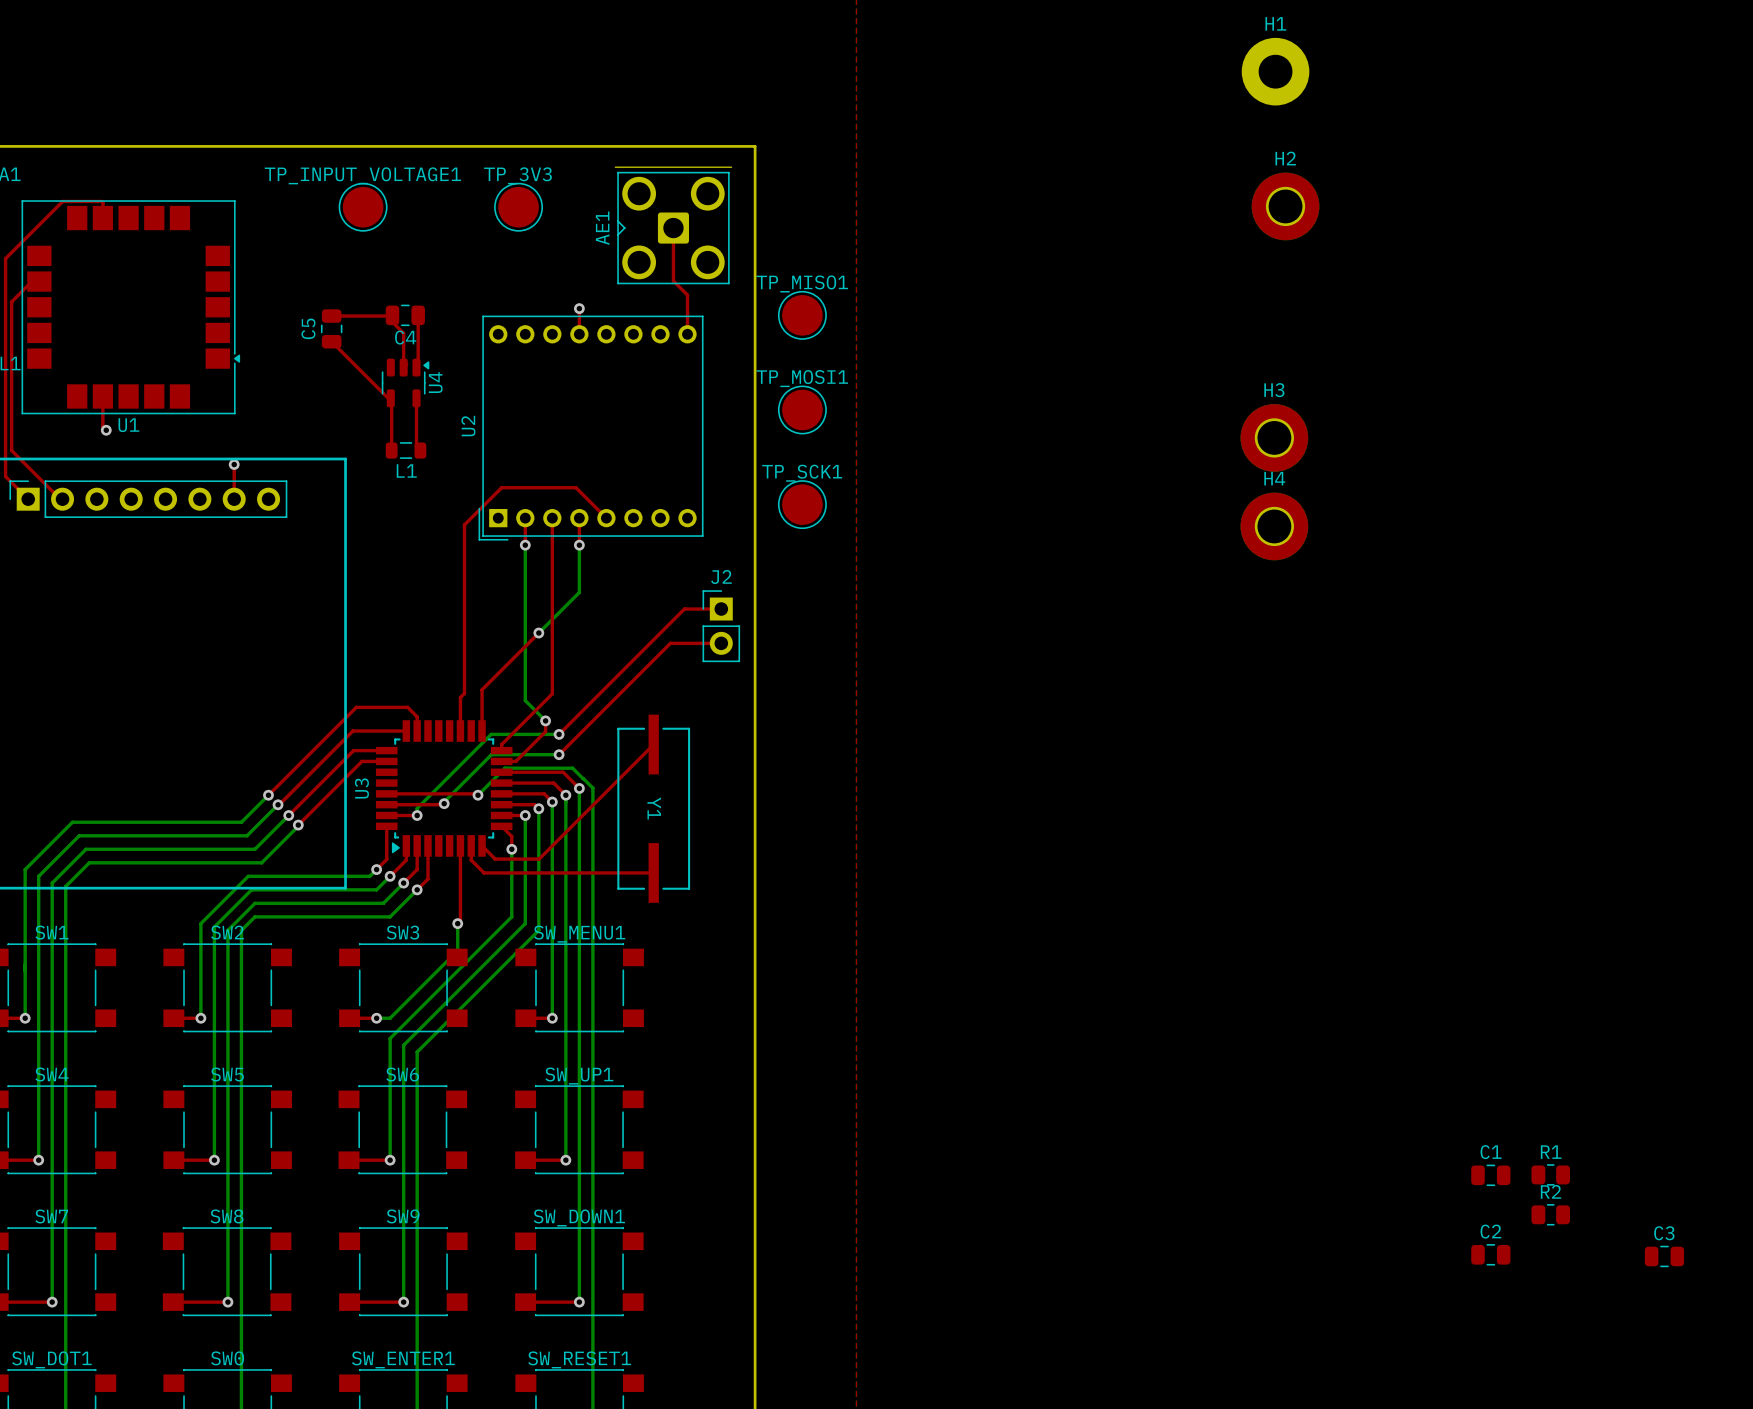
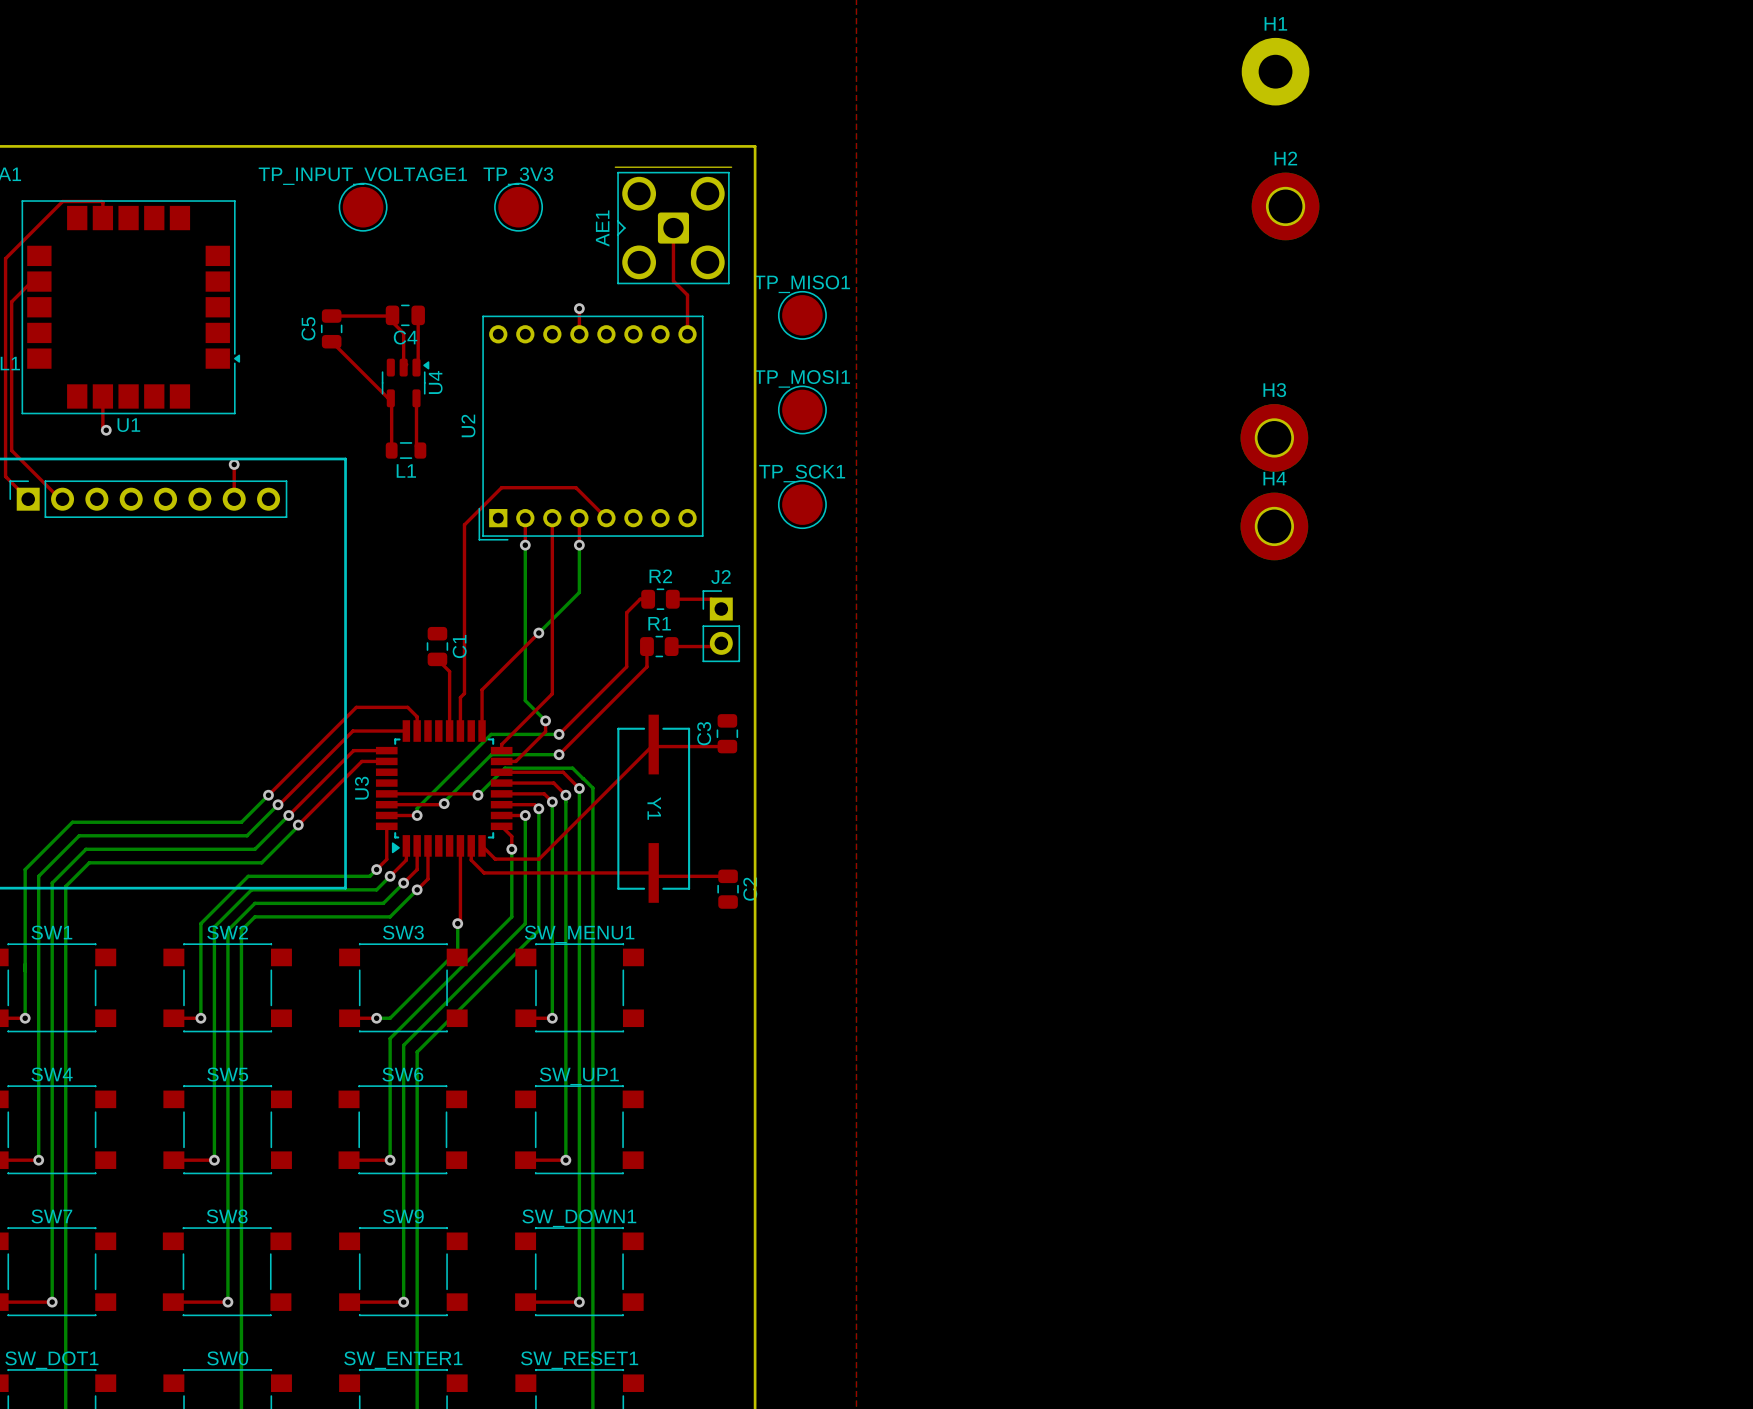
top track: none -> (672, 599) (711, 599) (721, 609)
top track: (721, 609) (684, 609) (626, 666) -> (648, 599) (640, 599) (626, 612) (626, 666)
top track: (721, 643) (670, 643) (646, 666) -> (721, 643) (718, 646) (671, 646)
top track: none -> (646, 646) (646, 666)
top track: none -> (437, 659) (449, 671) (449, 731)
top track: none -> (653, 744) (655, 746) (727, 746)
top track: none -> (653, 872) (657, 876) (728, 876)
R1 position: (1550, 1174) -> (659, 646)
C1 rotation: 0° (1490, 1175) -> 90° clockwise (437, 646)
C1 position: (1490, 1175) -> (437, 646)
R2 position: (1550, 1214) -> (660, 599)
C3 name position: C3 (1664, 1233) -> C3 (704, 733)
C2 rotation: 0° (1490, 1254) -> 90° clockwise (728, 889)
C2 position: (1490, 1254) -> (728, 889)
C3 rotation: 0° (1664, 1256) -> 90° clockwise (727, 733)
C3 position: (1664, 1256) -> (727, 733)

